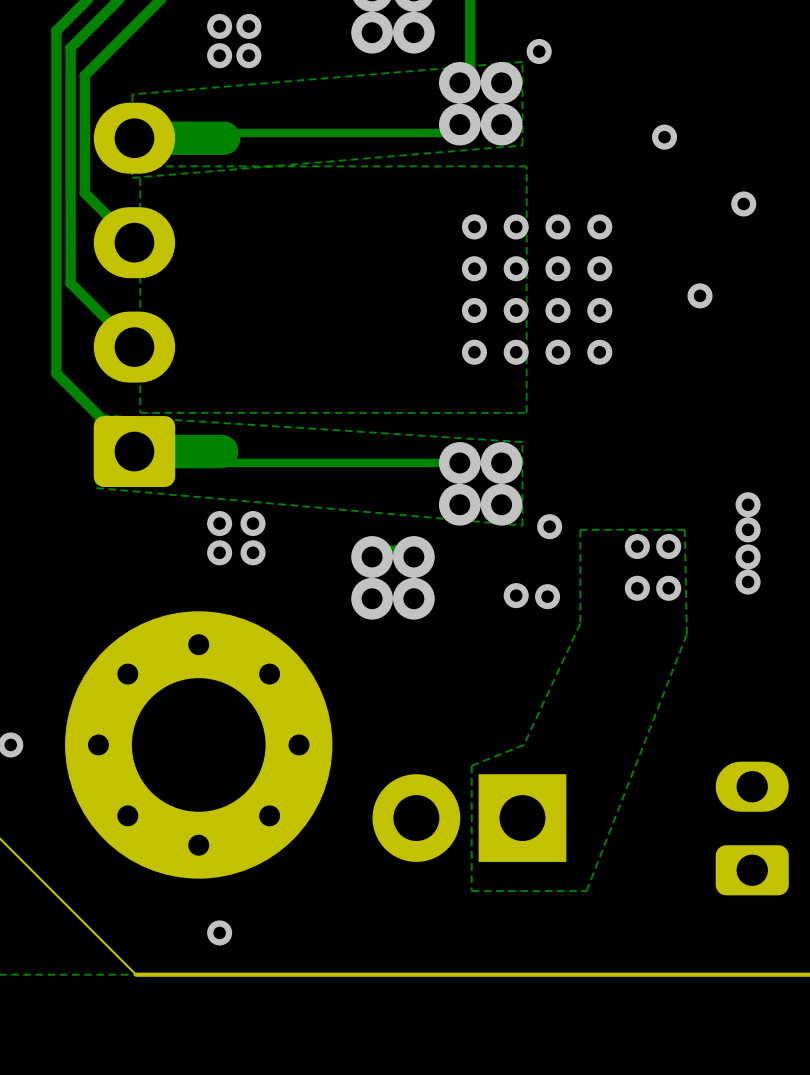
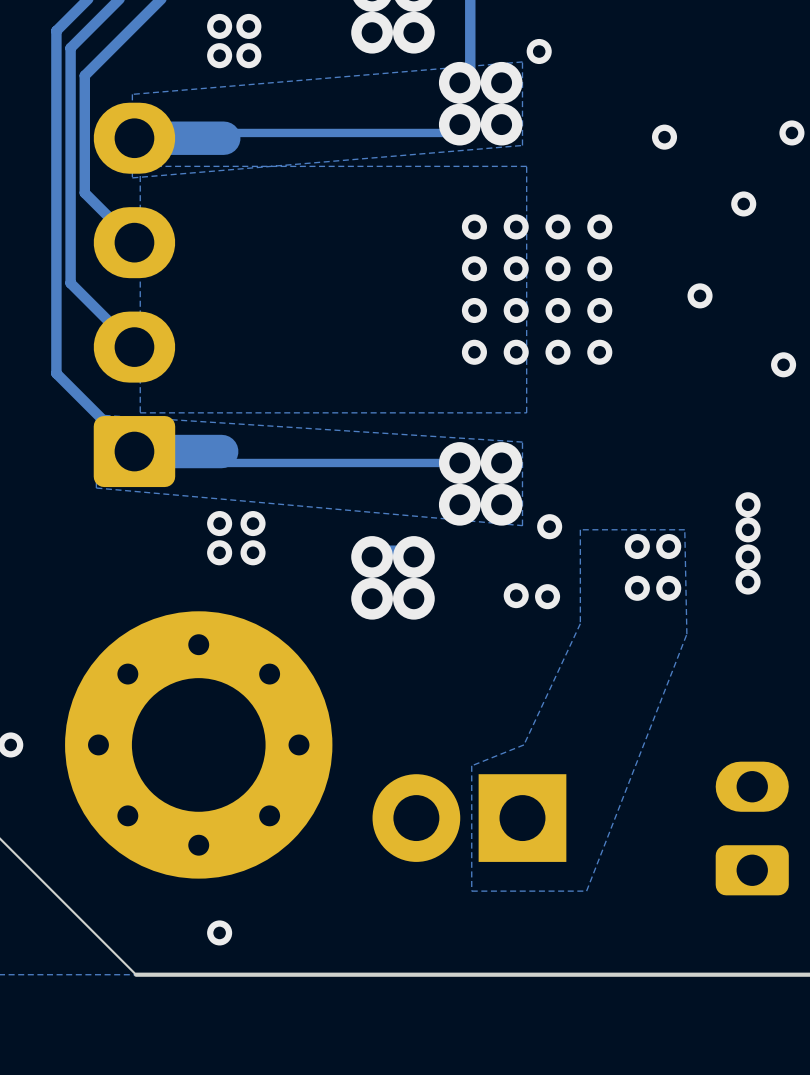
via: none -> (791, 132)
via: none -> (783, 364)

